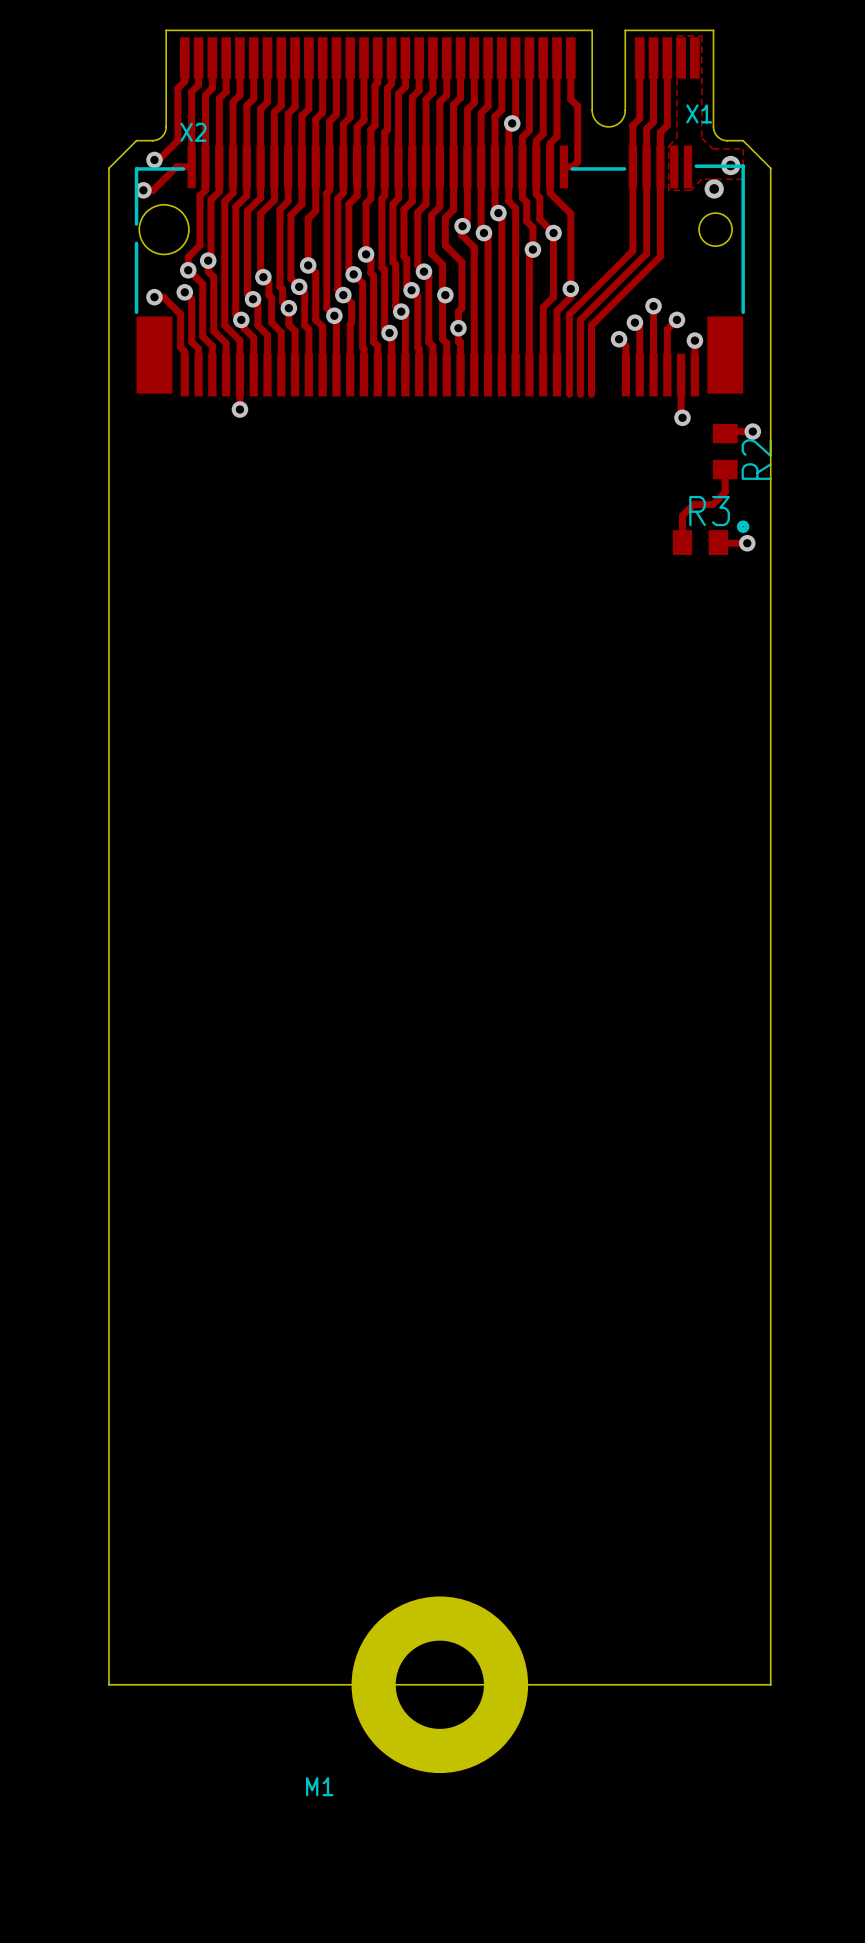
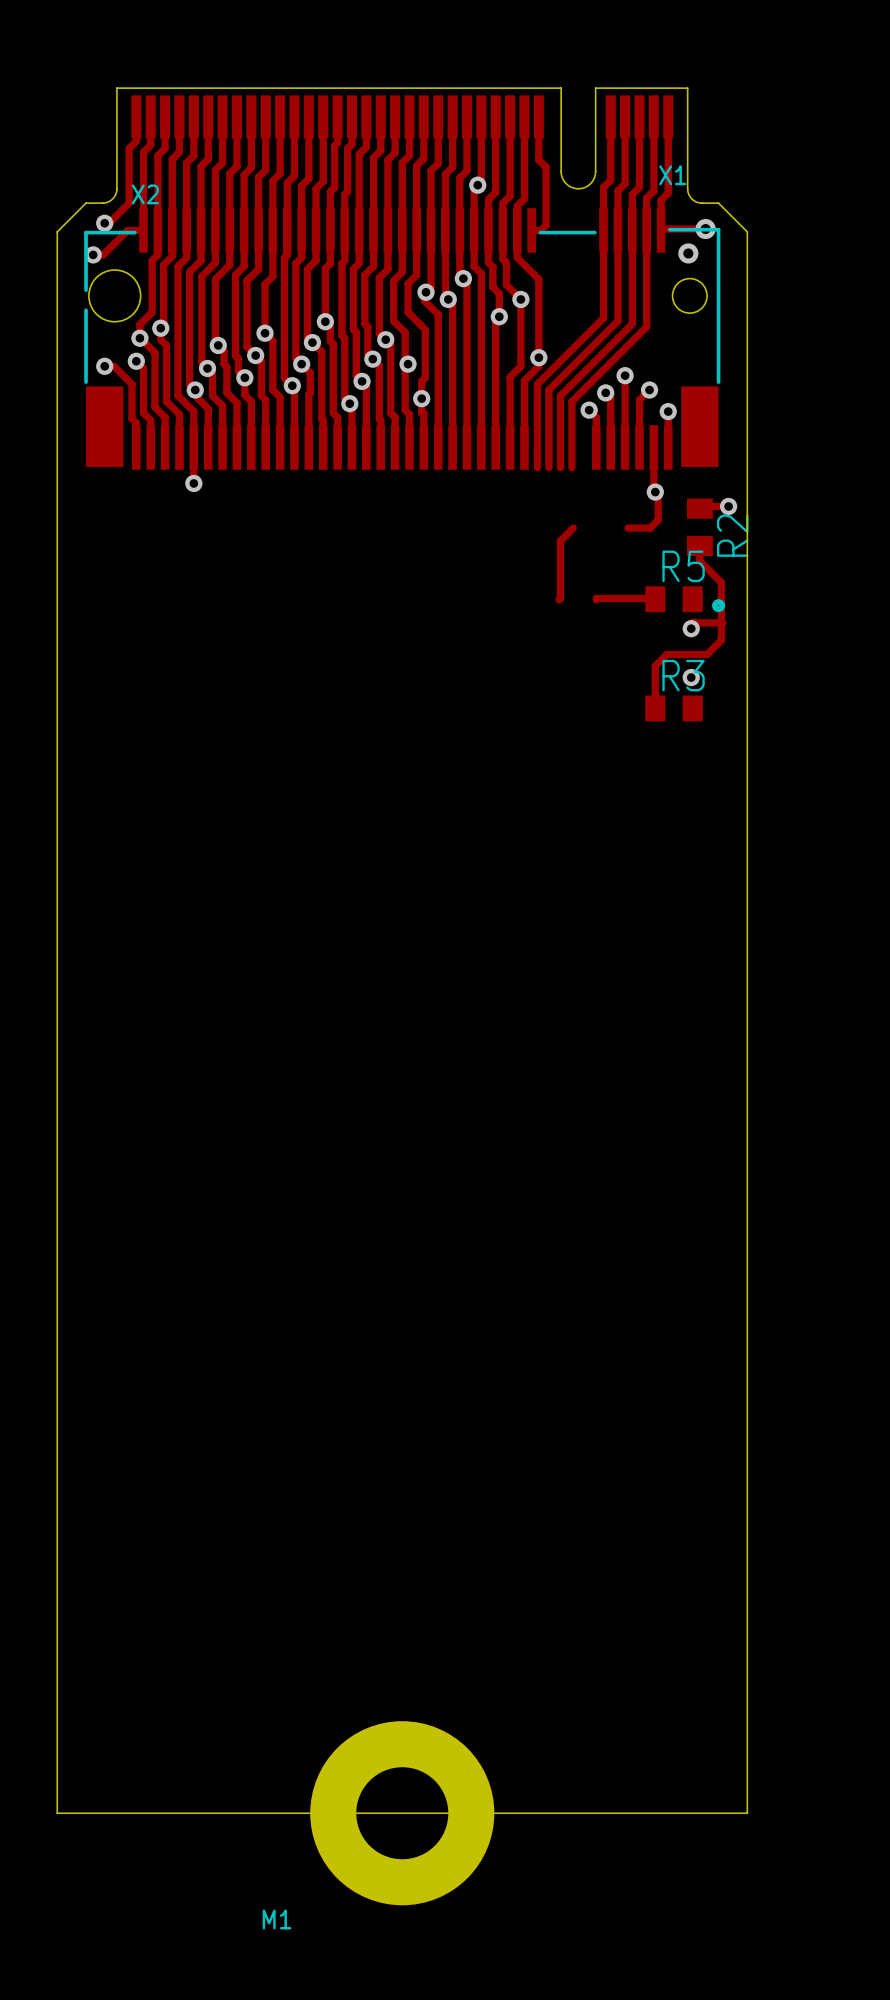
zone outline: (676, 35) (676, 137) (668, 146) (668, 190) (690, 190) (701, 179) (743, 179) (743, 148) (712, 148) (701, 137) (701, 35) (676, 35) -> none
track: none -> (653, 116) (653, 190) (646, 198) (646, 326) (571, 401) (571, 467)
track: none -> (668, 116) (668, 193) (661, 200) (661, 230) (705, 229)
track: none -> (655, 492) (658, 494) (658, 520) (650, 528) (627, 528)
track: none -> (573, 528) (560, 540) (558, 599)
track: (725, 483) (725, 492) (712, 504) (693, 504) (682, 515) (682, 542) -> (699, 561) (721, 582) (721, 640) (707, 654) (666, 654) (655, 666) (655, 708)
track: none -> (655, 599) (596, 599)
R5: none -> (673, 599)
R3 position: (700, 542) -> (673, 708)
via: (747, 543) -> none
via: none -> (691, 628)
via: none -> (691, 677)

